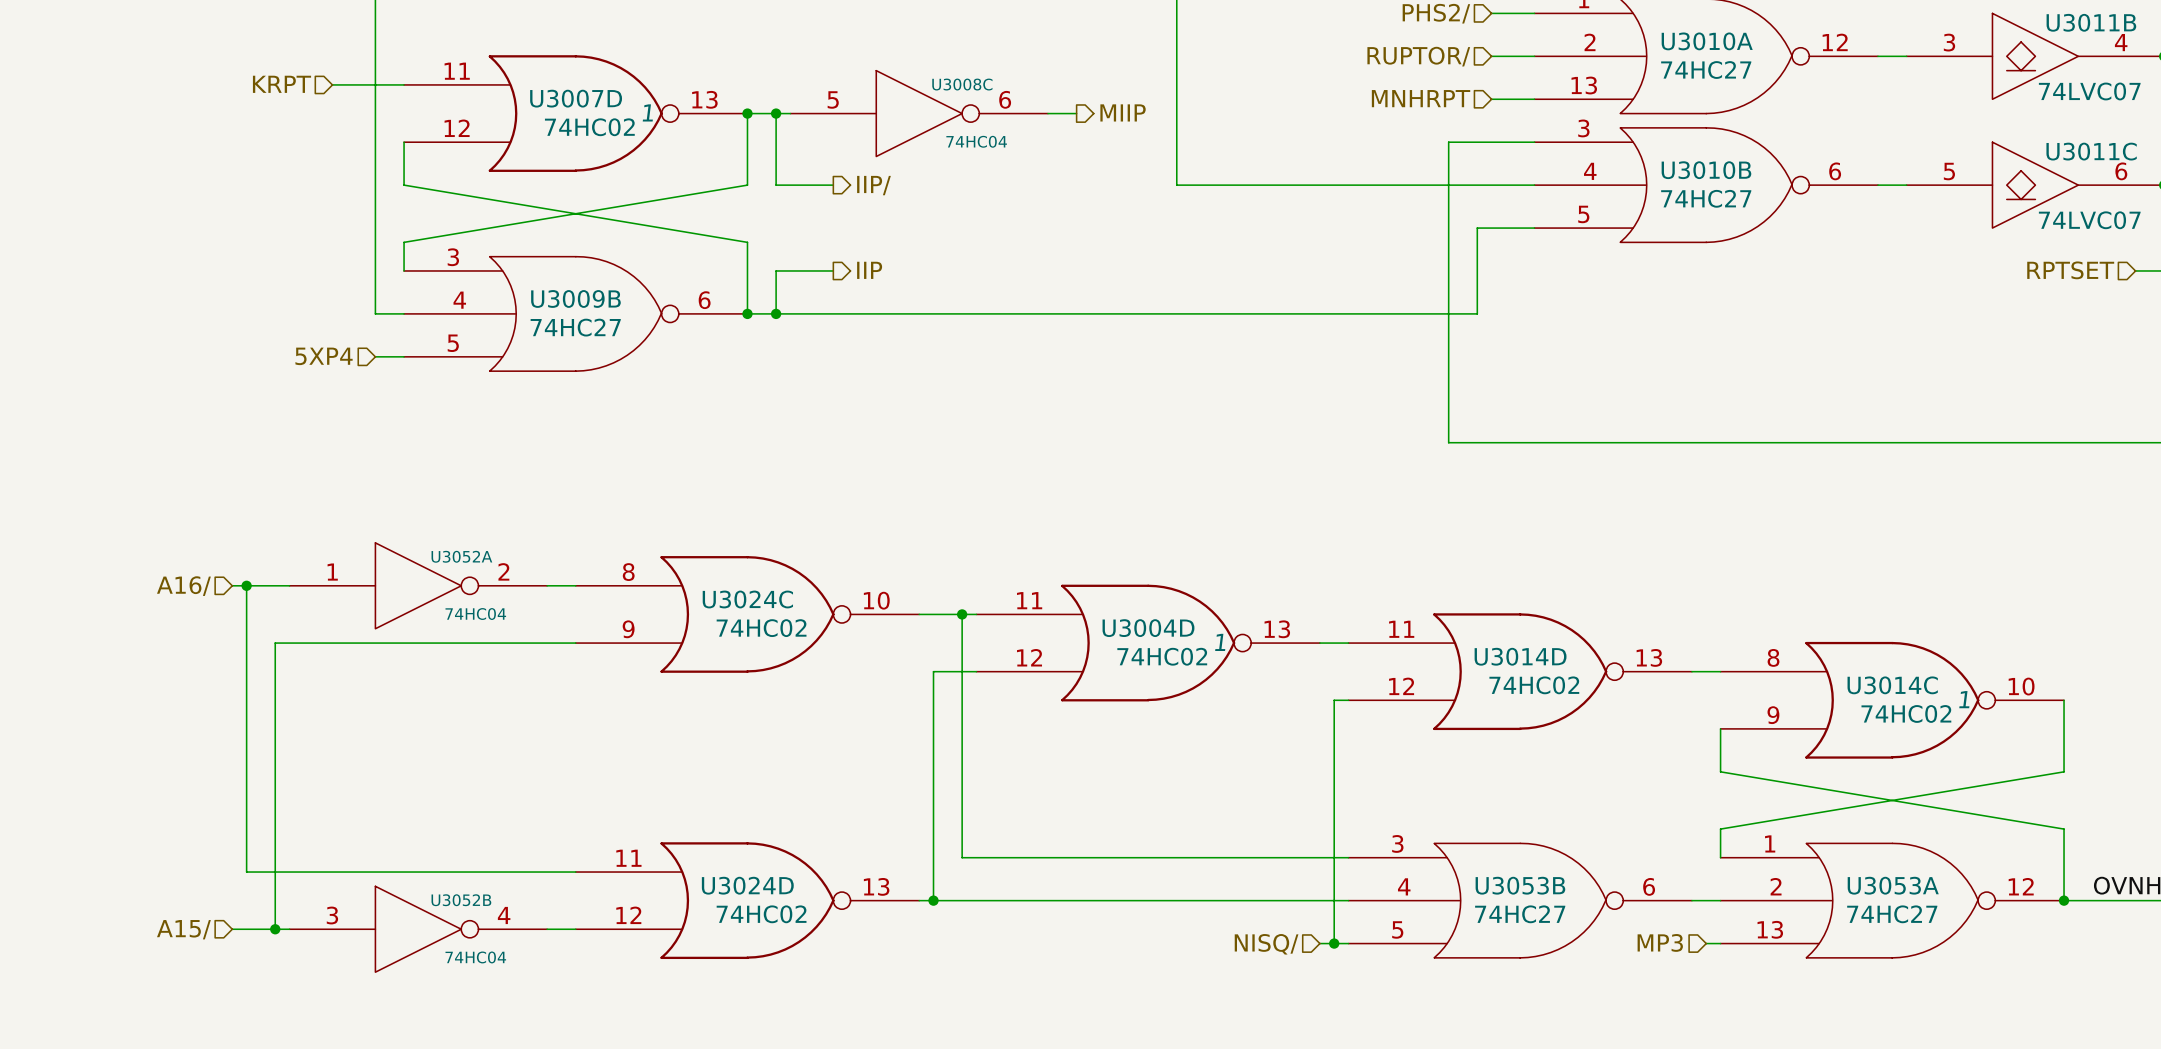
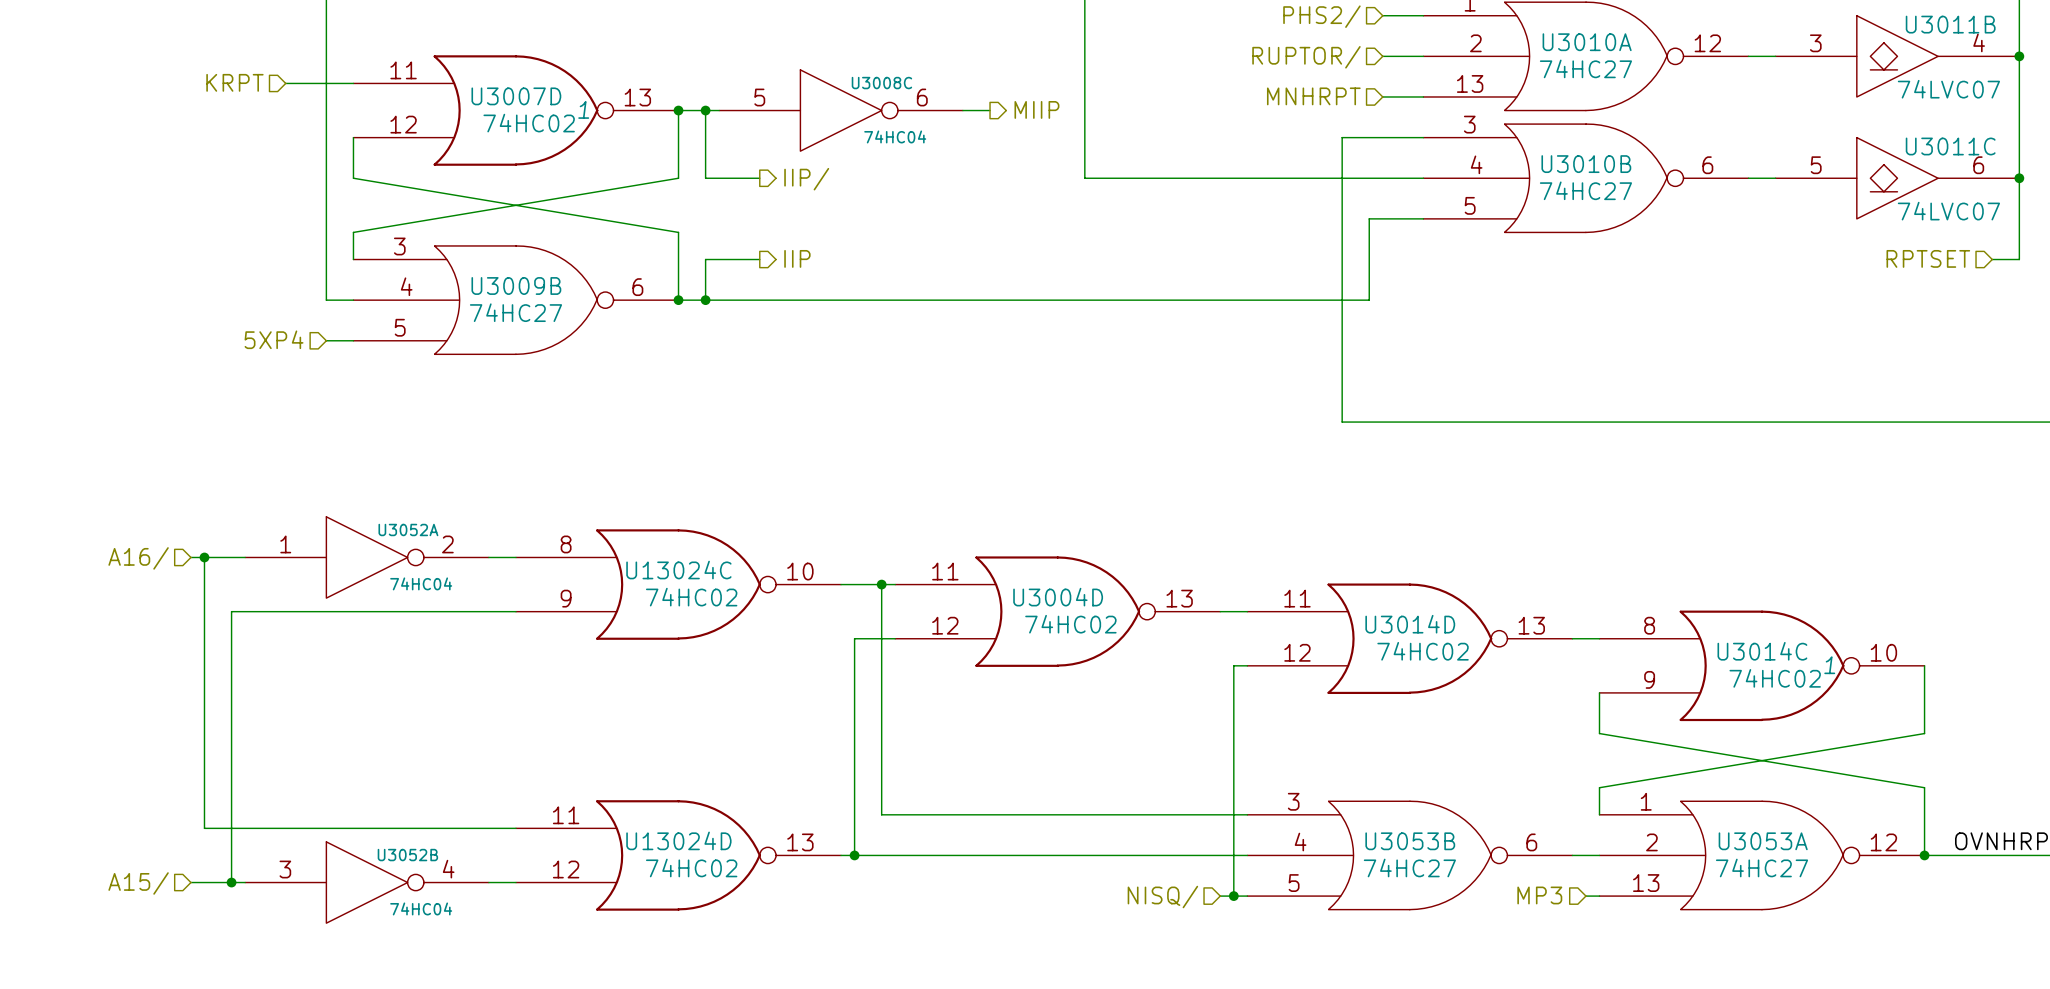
U3024C name: U3024C (747, 599) -> U13024C (678, 570)
U3004D text: 1 (1220, 642) -> none
U3024D name: U3024D (747, 885) -> U13024D (678, 840)

